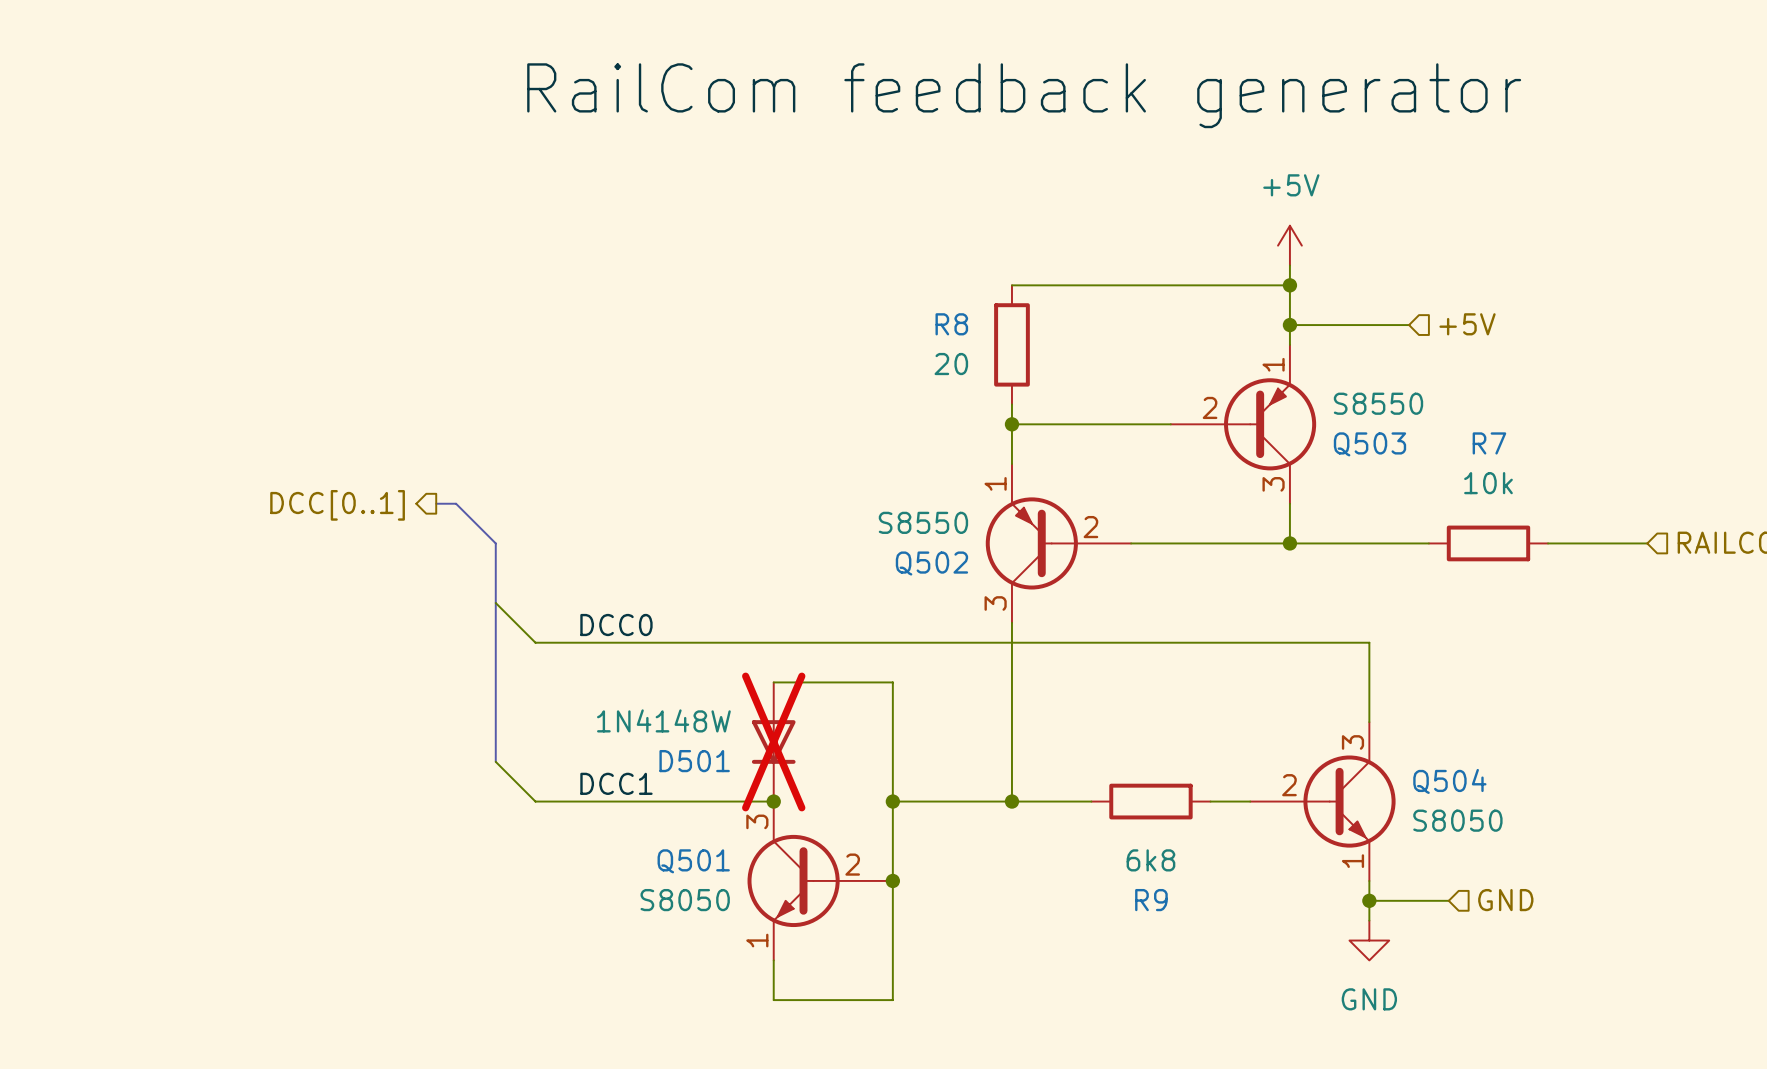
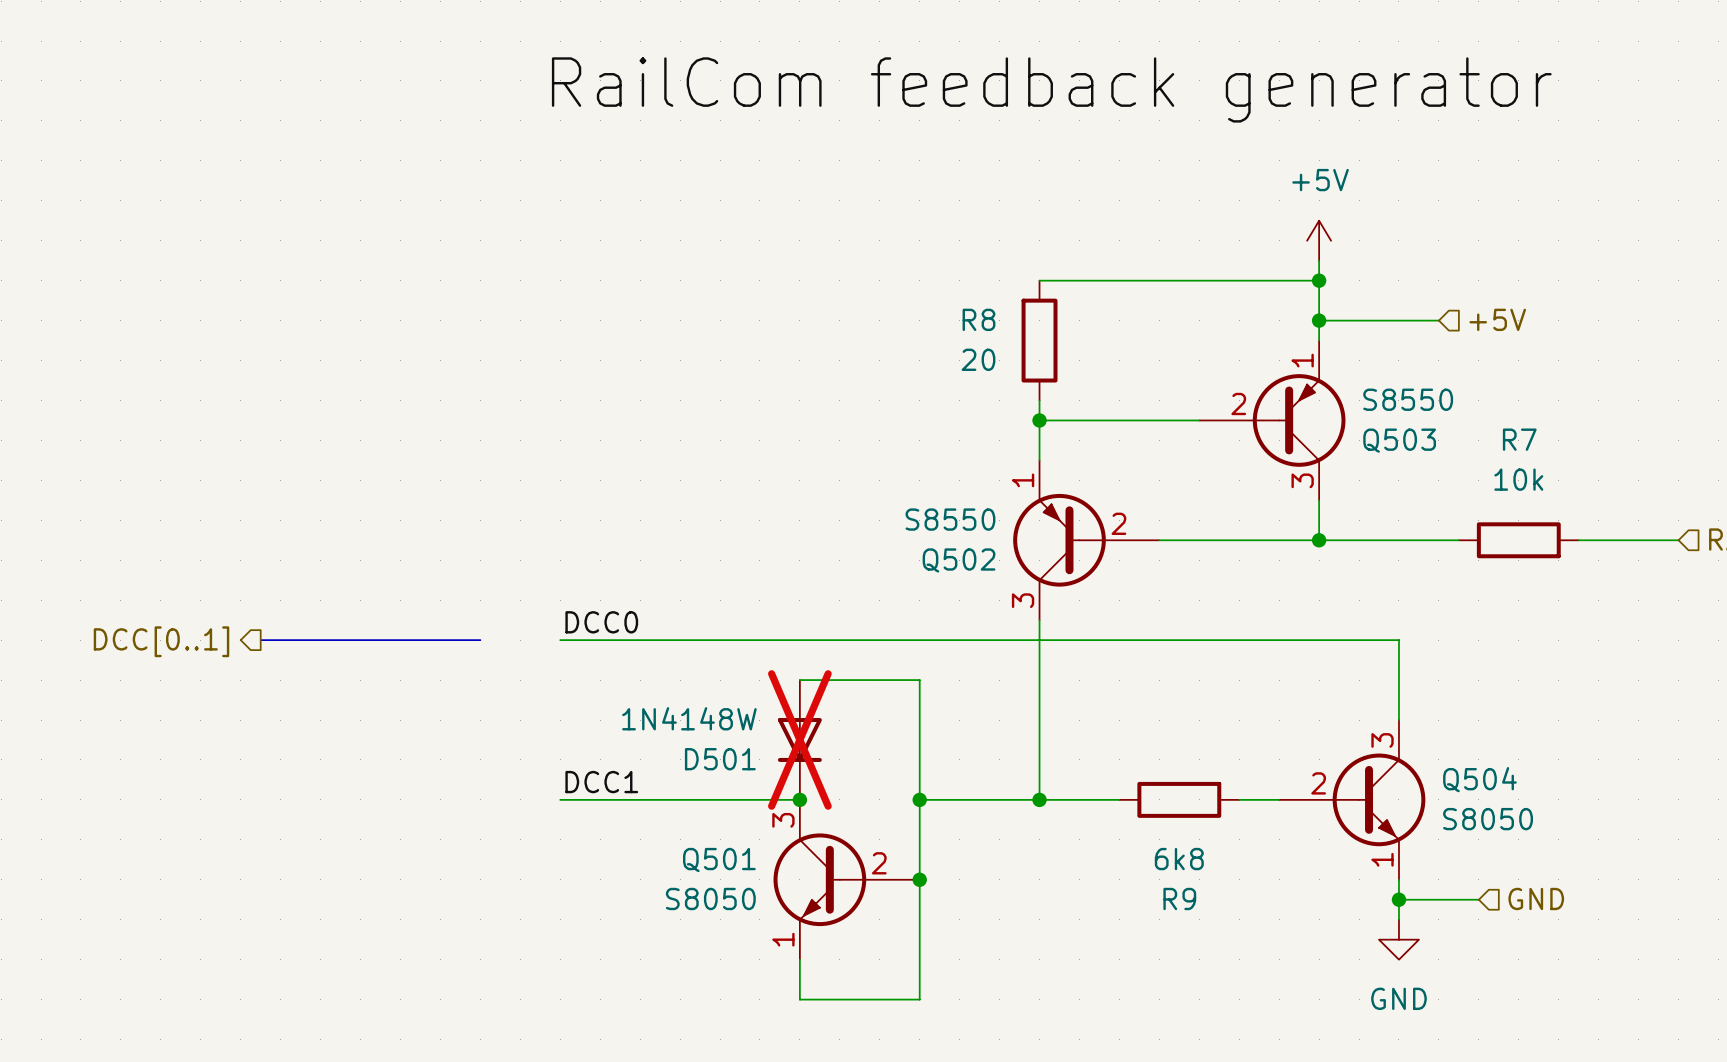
bus: (436, 503) (456, 503) (495, 543) (495, 761) -> none
hierarchical label position: DCC[0..1] (337, 505) -> DCC[0..1] (161, 641)
wire: (495, 603) (535, 642) -> none
label position: DCC0 (616, 625) -> DCC0 (601, 622)
bus: none -> (260, 640) (480, 640)
wire: (495, 761) (535, 801) -> none
label position: DCC1 (616, 783) -> DCC1 (601, 782)

